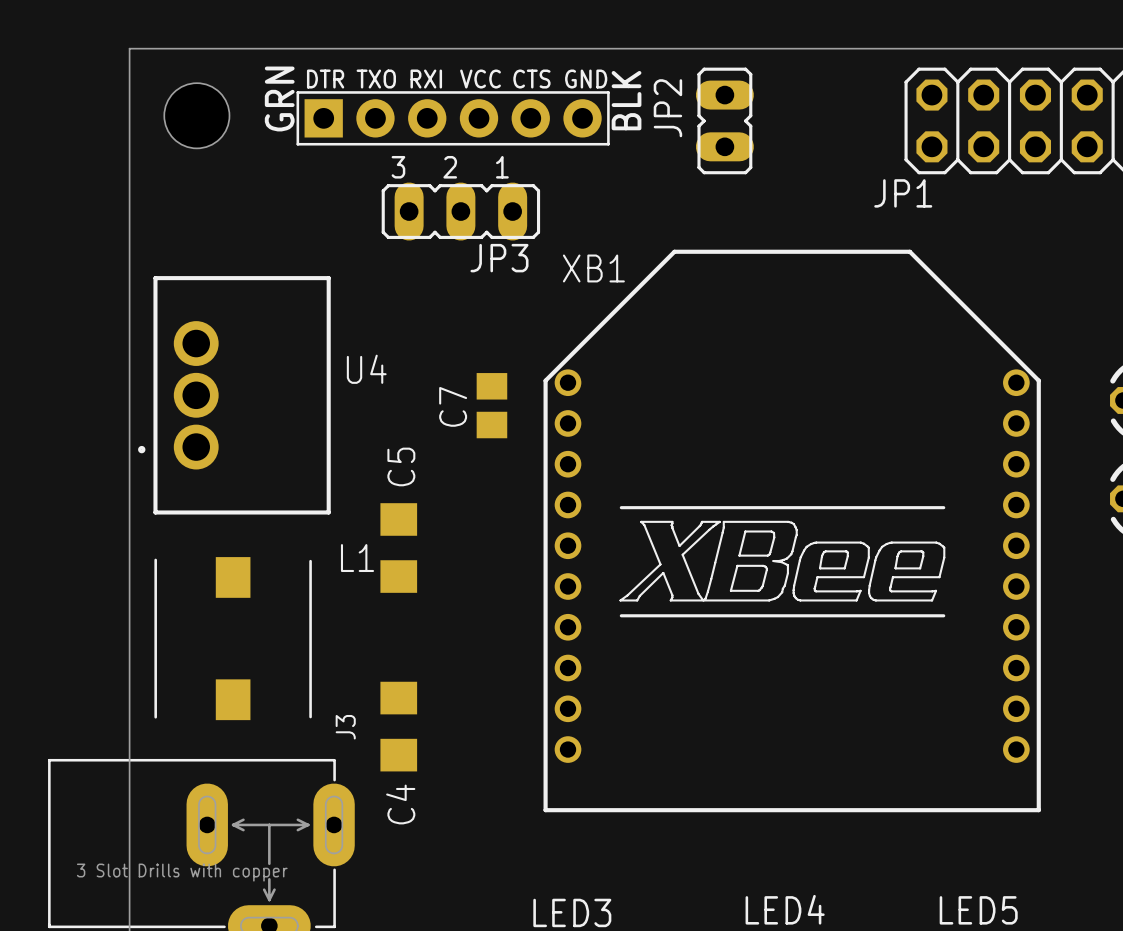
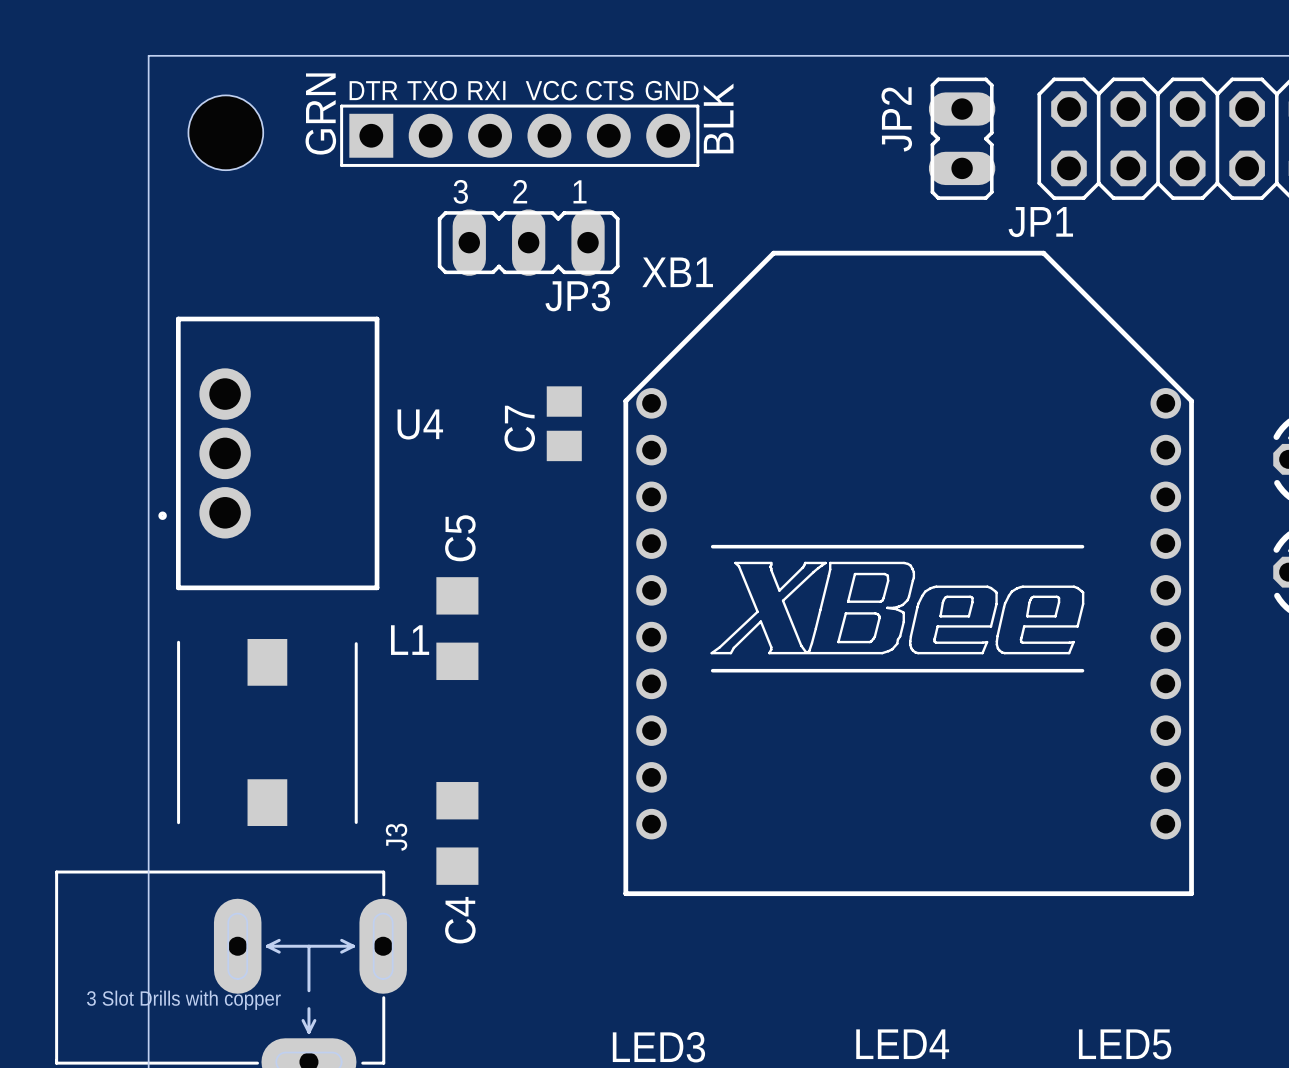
JP2 position: (724, 120) -> (962, 138)
C7 position: (491, 405) -> (564, 423)
XB1 position: (792, 530) -> (908, 573)

